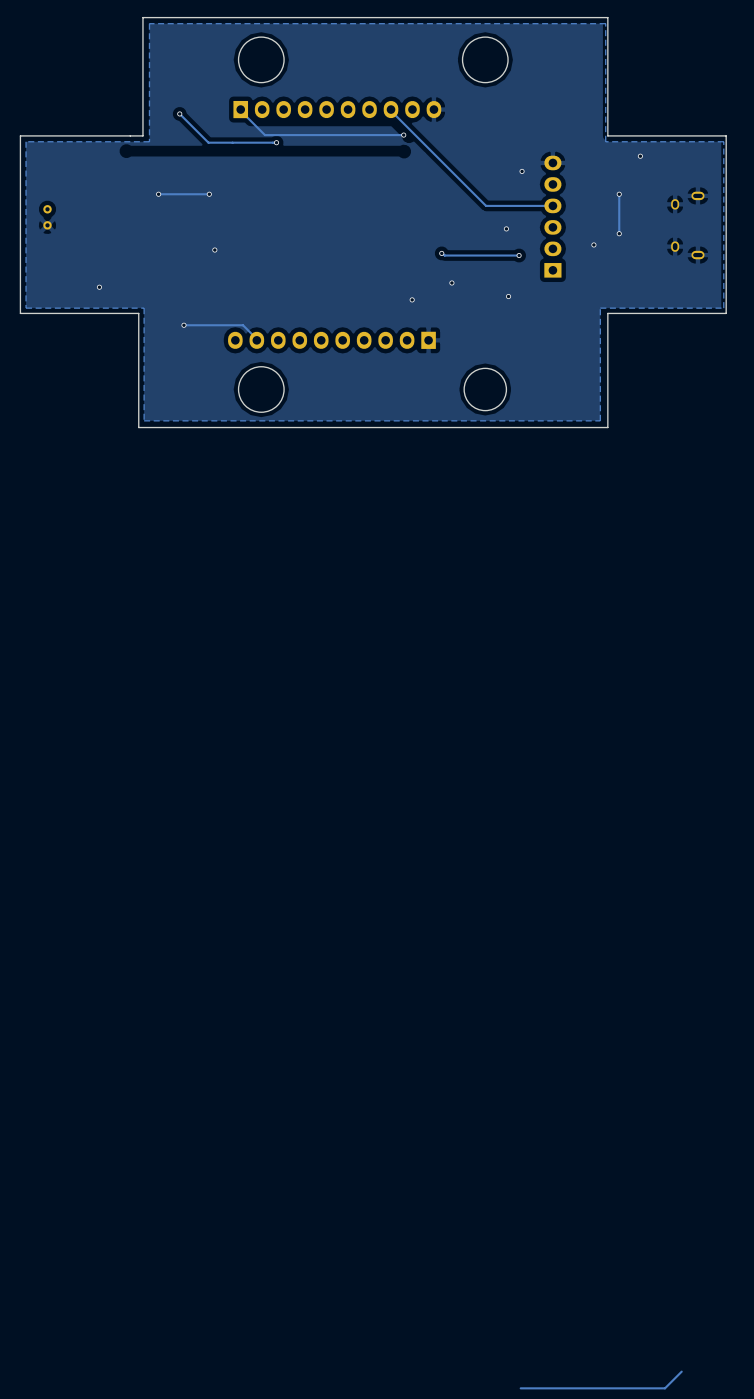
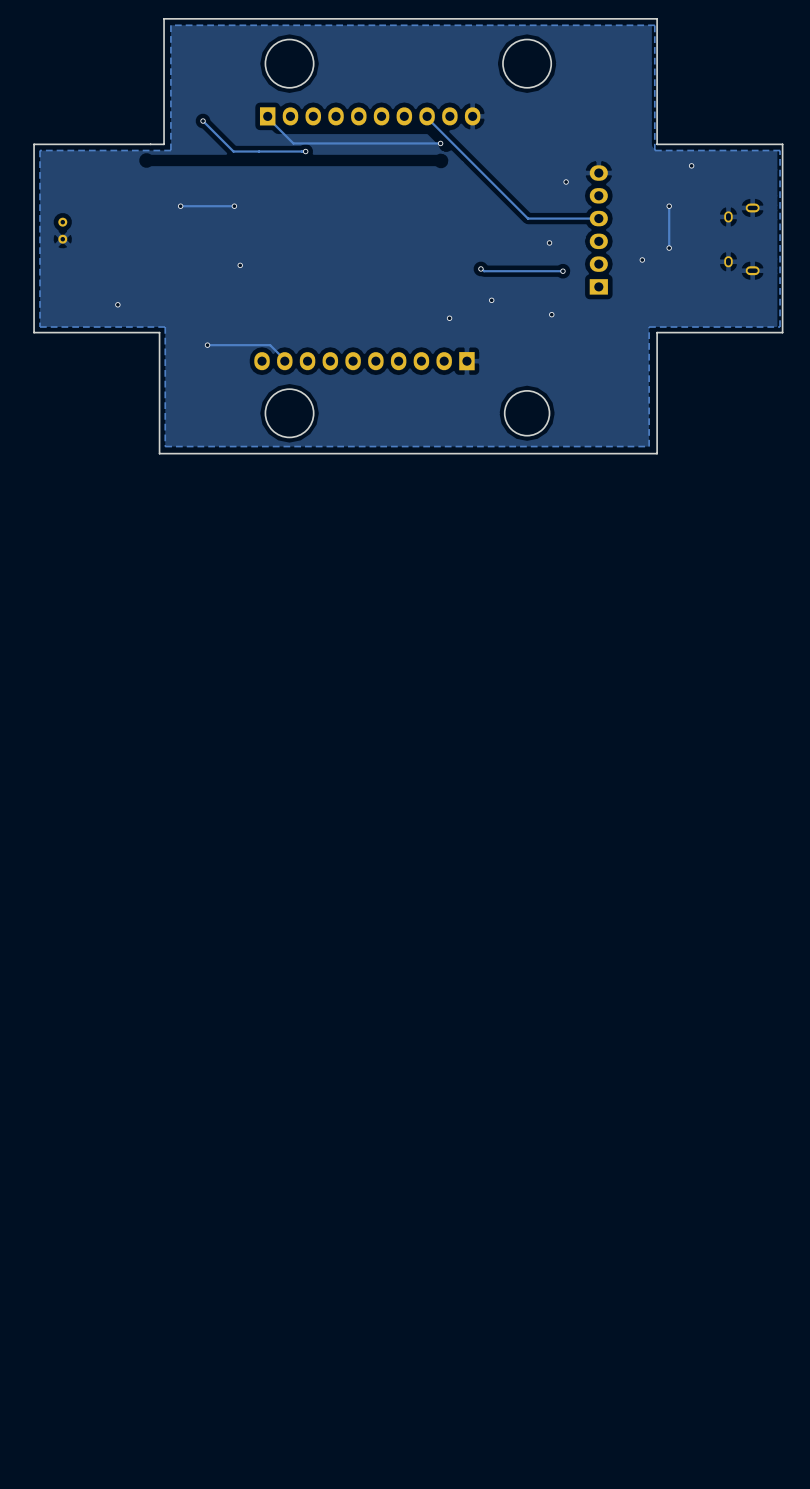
track: (681, 1371) (665, 1388) (520, 1388) -> none

